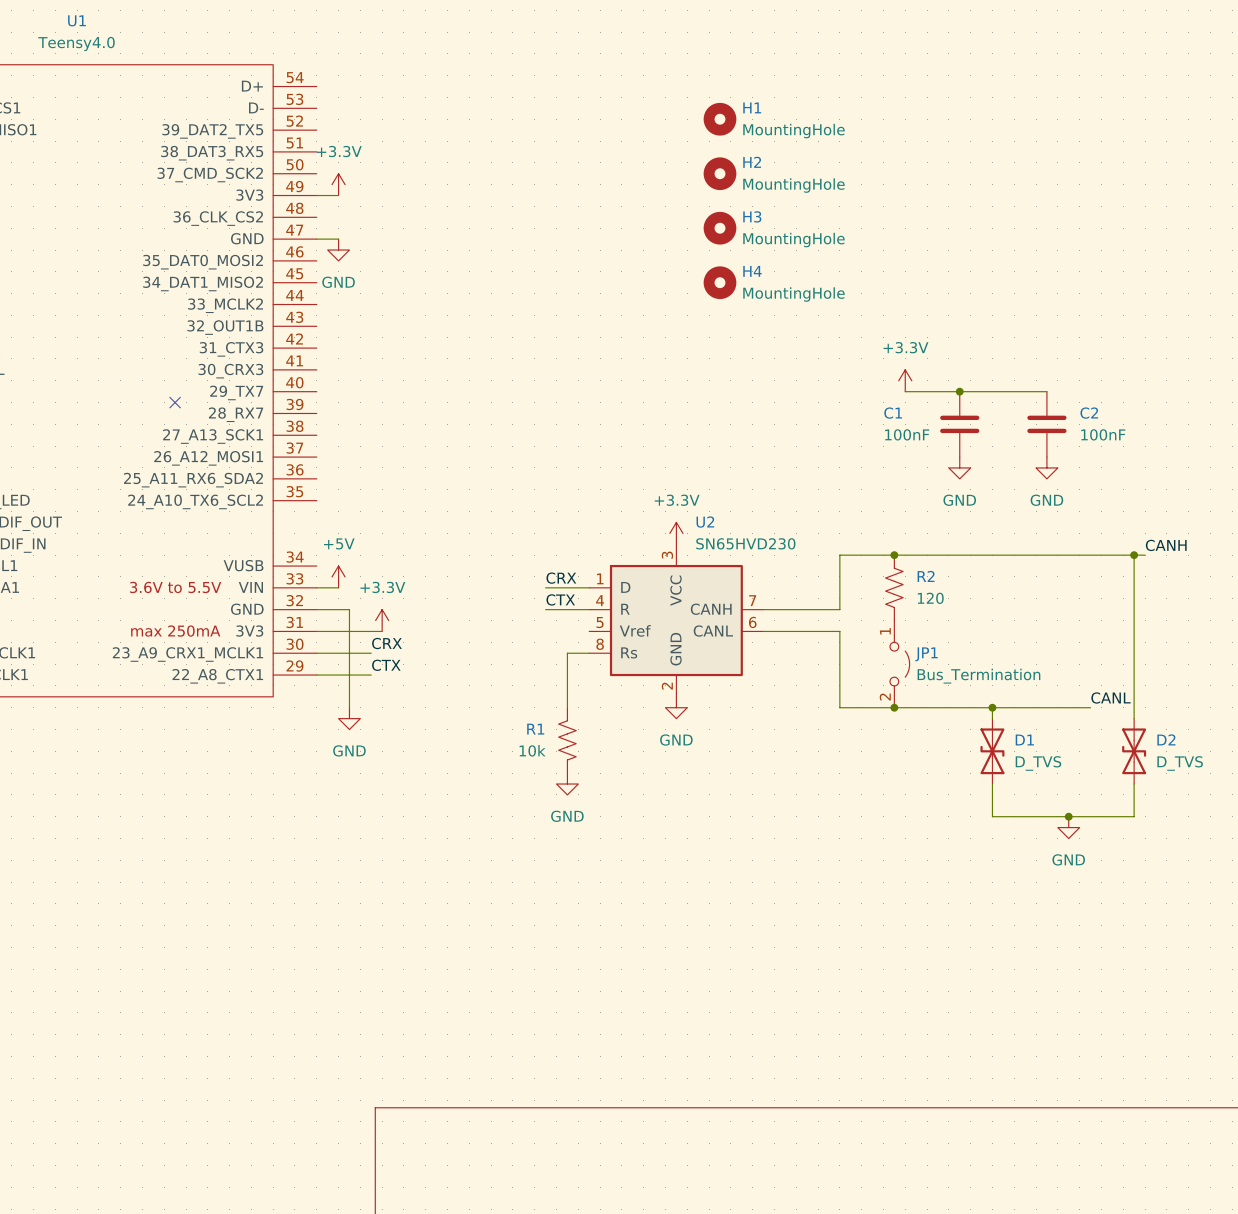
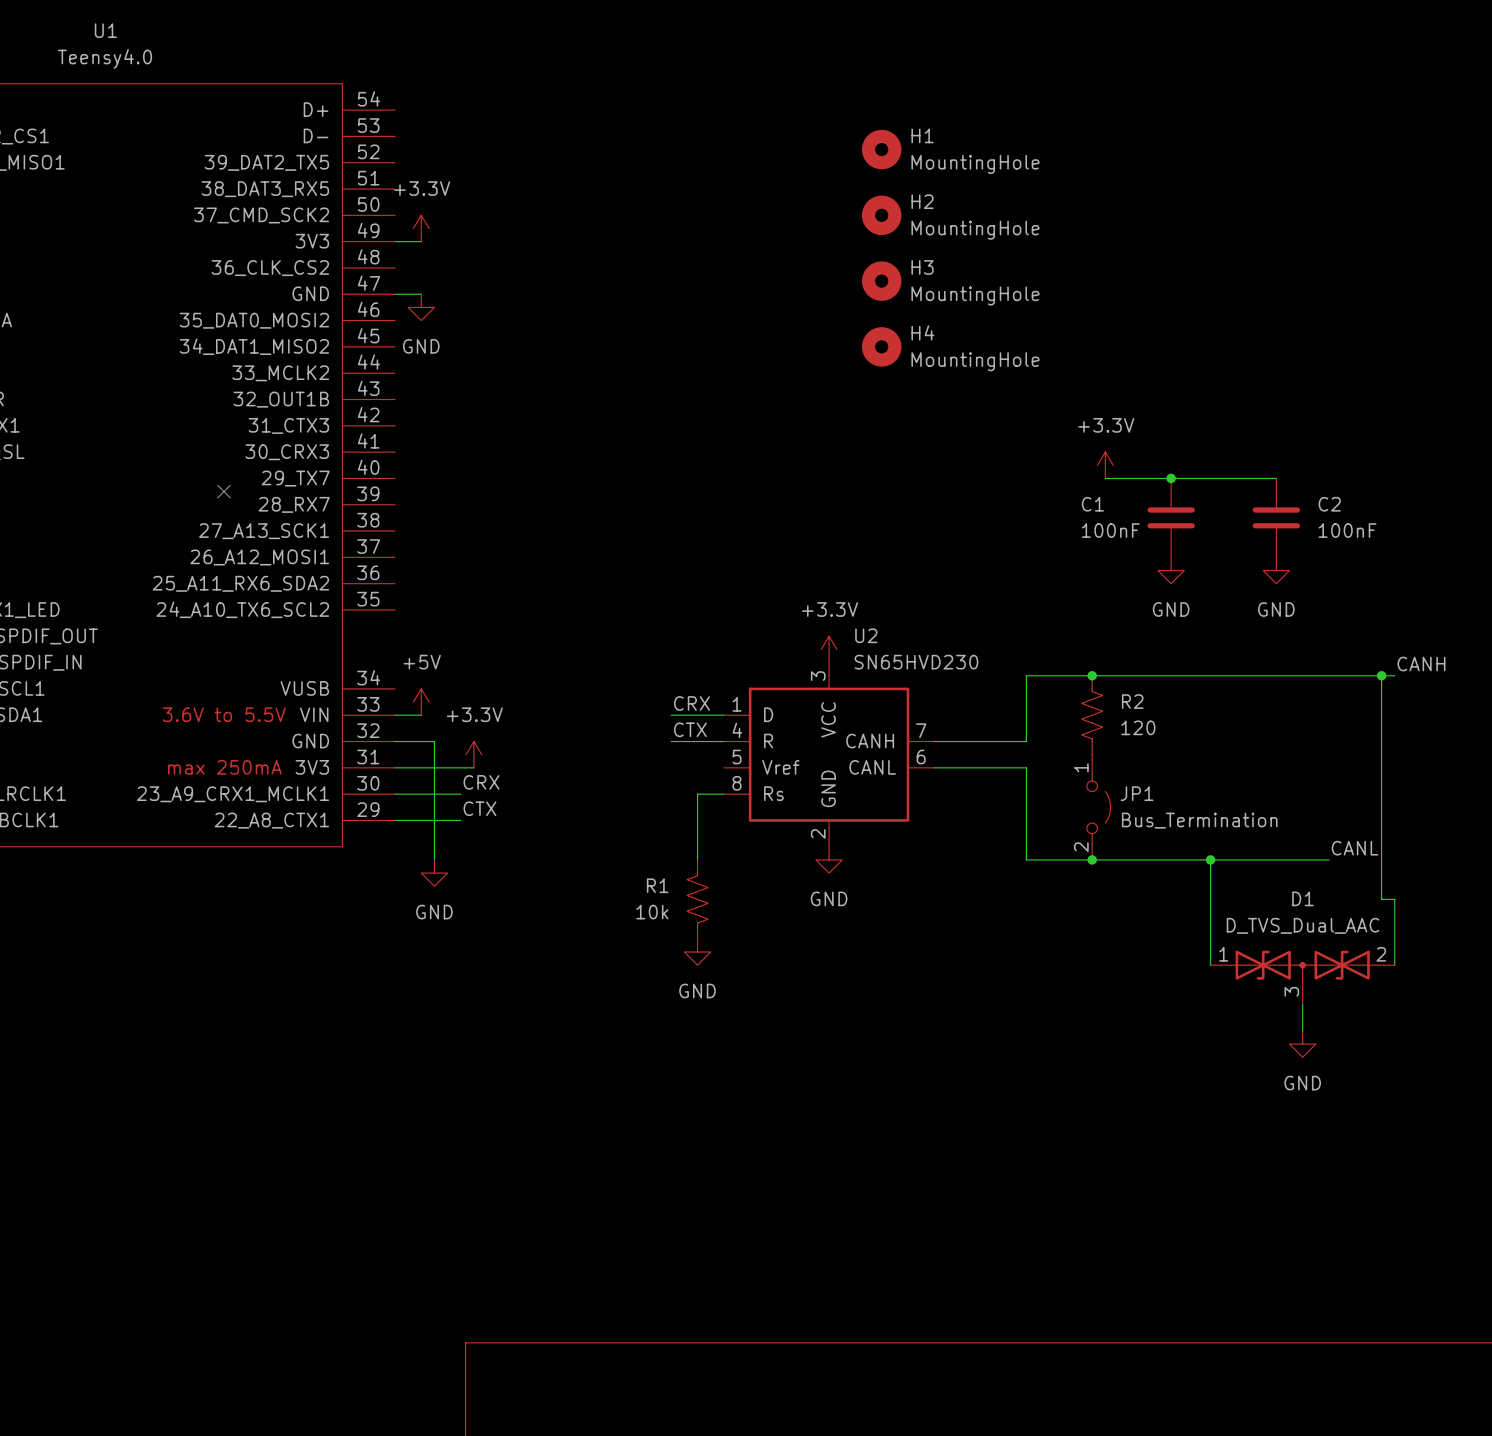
D1 symbol: [980, 718, 1005, 785] -> [1210, 950, 1395, 1005]
wire: none -> (1381, 873) (1381, 899) (1394, 899) (1394, 965)
D1 name position: D1 (1024, 740) -> D1 (1302, 898)
D2: D_TVS (1134, 751) -> none
D1 value: D_TVS (1038, 763) -> D_TVS_Dual_AAC (1302, 925)
wire: (1134, 784) (1134, 816) (992, 816) (992, 794) -> none
junction: (1068, 816) -> none
wire: none -> (1302, 1004) (1302, 1030)
power symbol position: GND (1068, 827) -> GND (1302, 1044)

